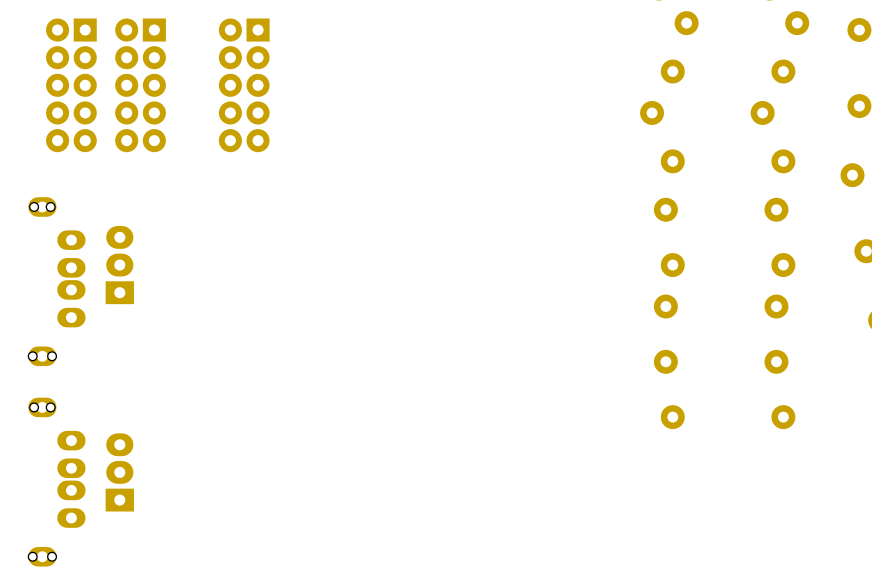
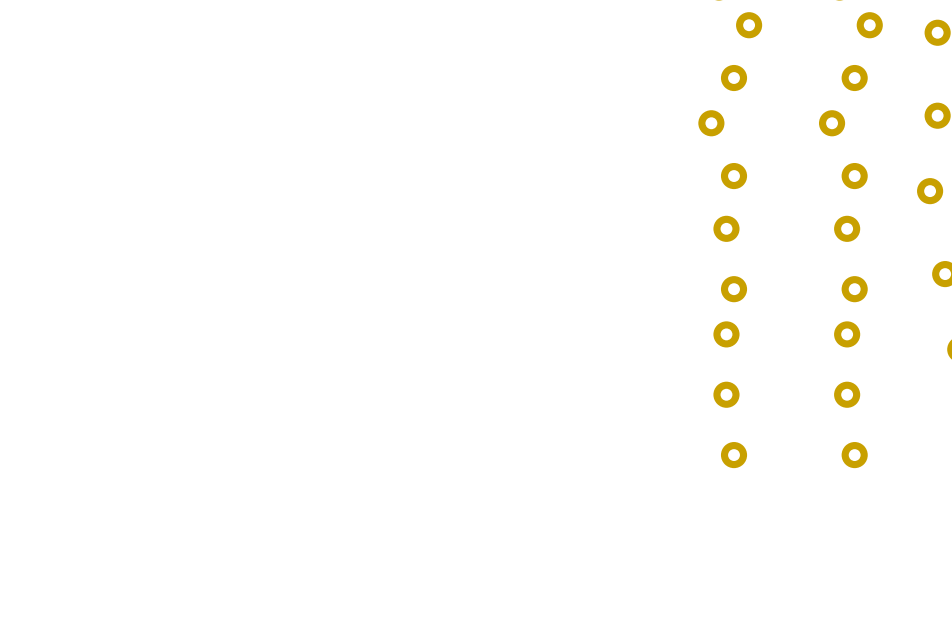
part: (71, 85) -> none
part: (140, 85) -> none
part: (244, 85) -> none
part: (119, 265) -> none
part: (56, 281) -> none
part: (119, 472) -> none
part: (56, 482) -> none

